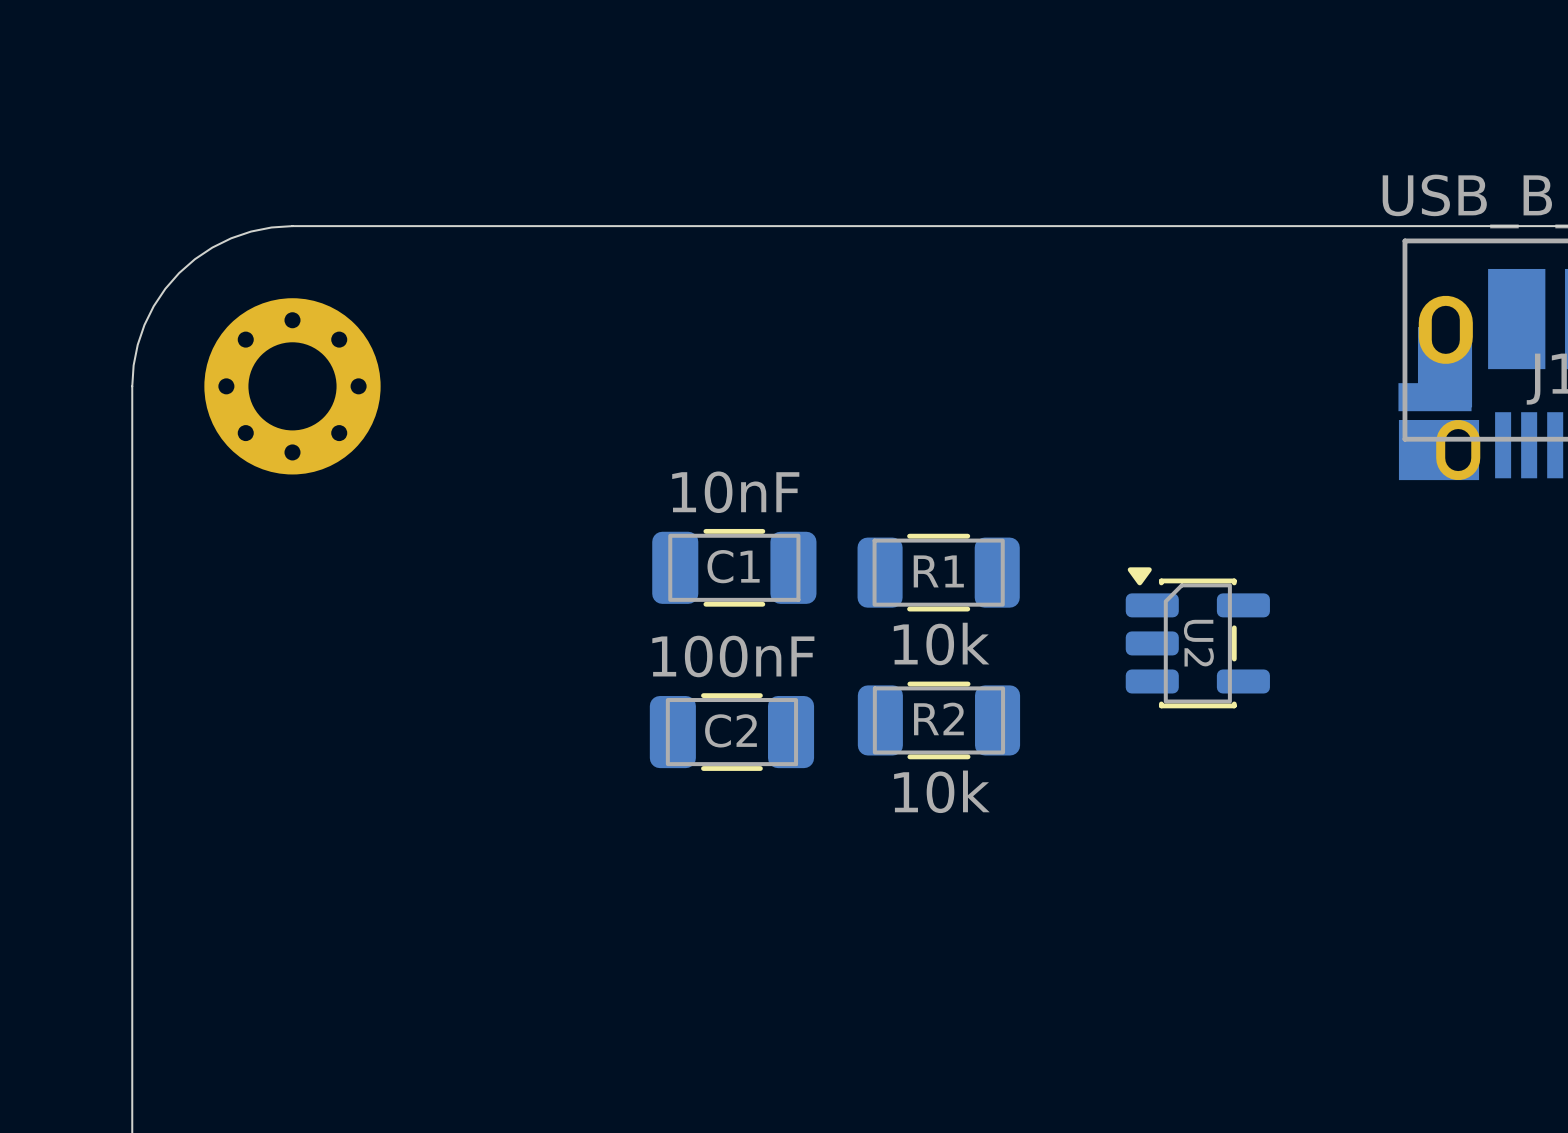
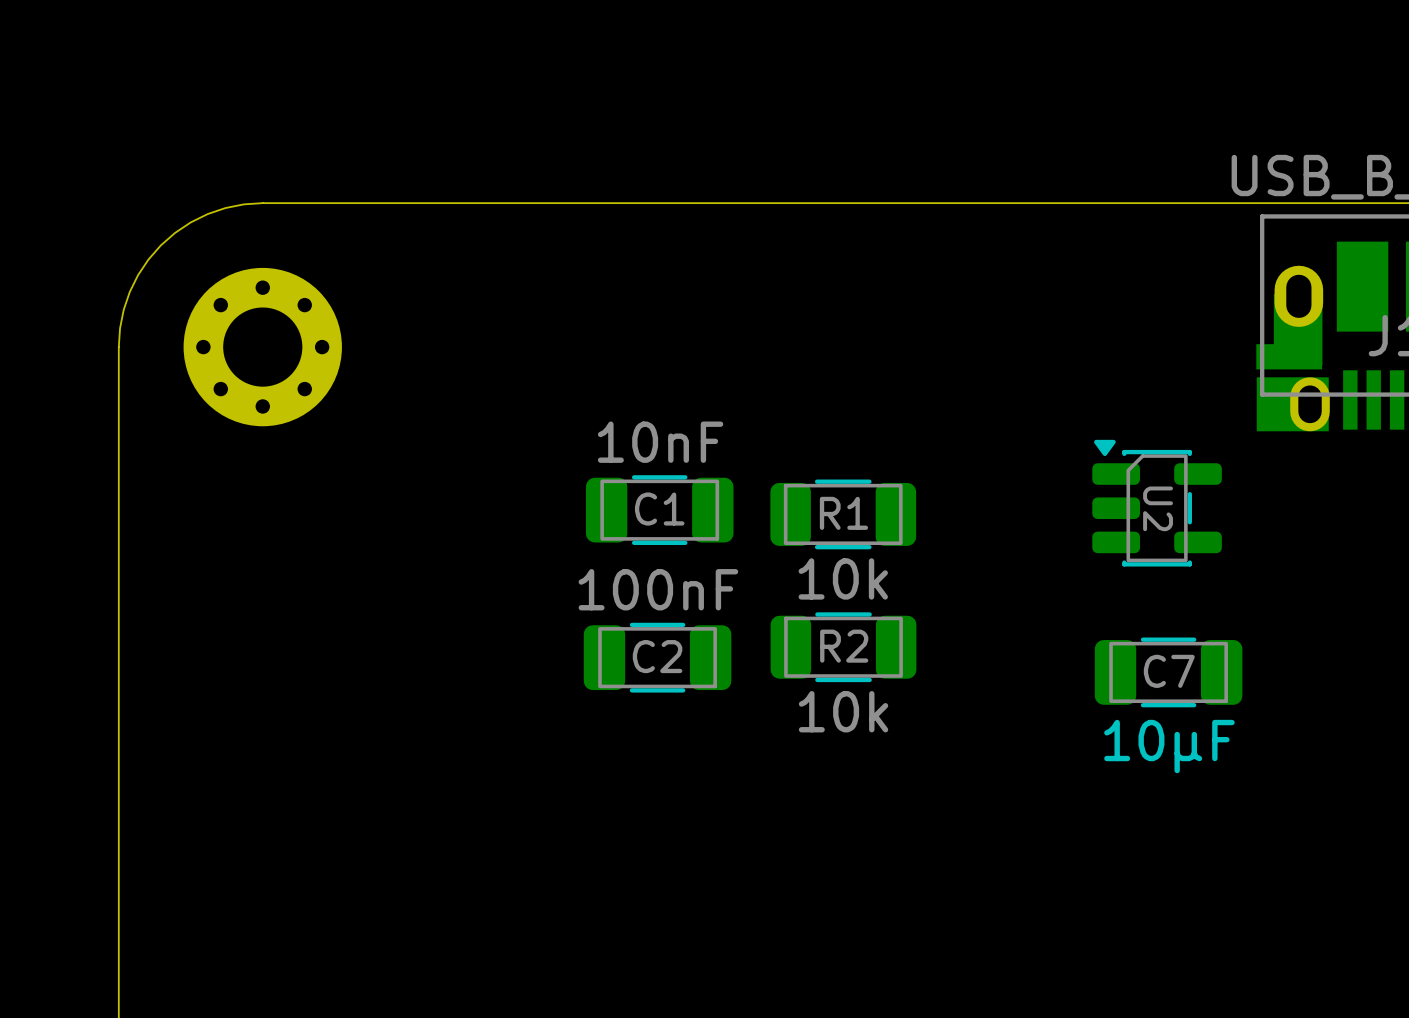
U2 position: (1197, 637) -> (1157, 503)
C7: none -> 10µF (1168, 672)

